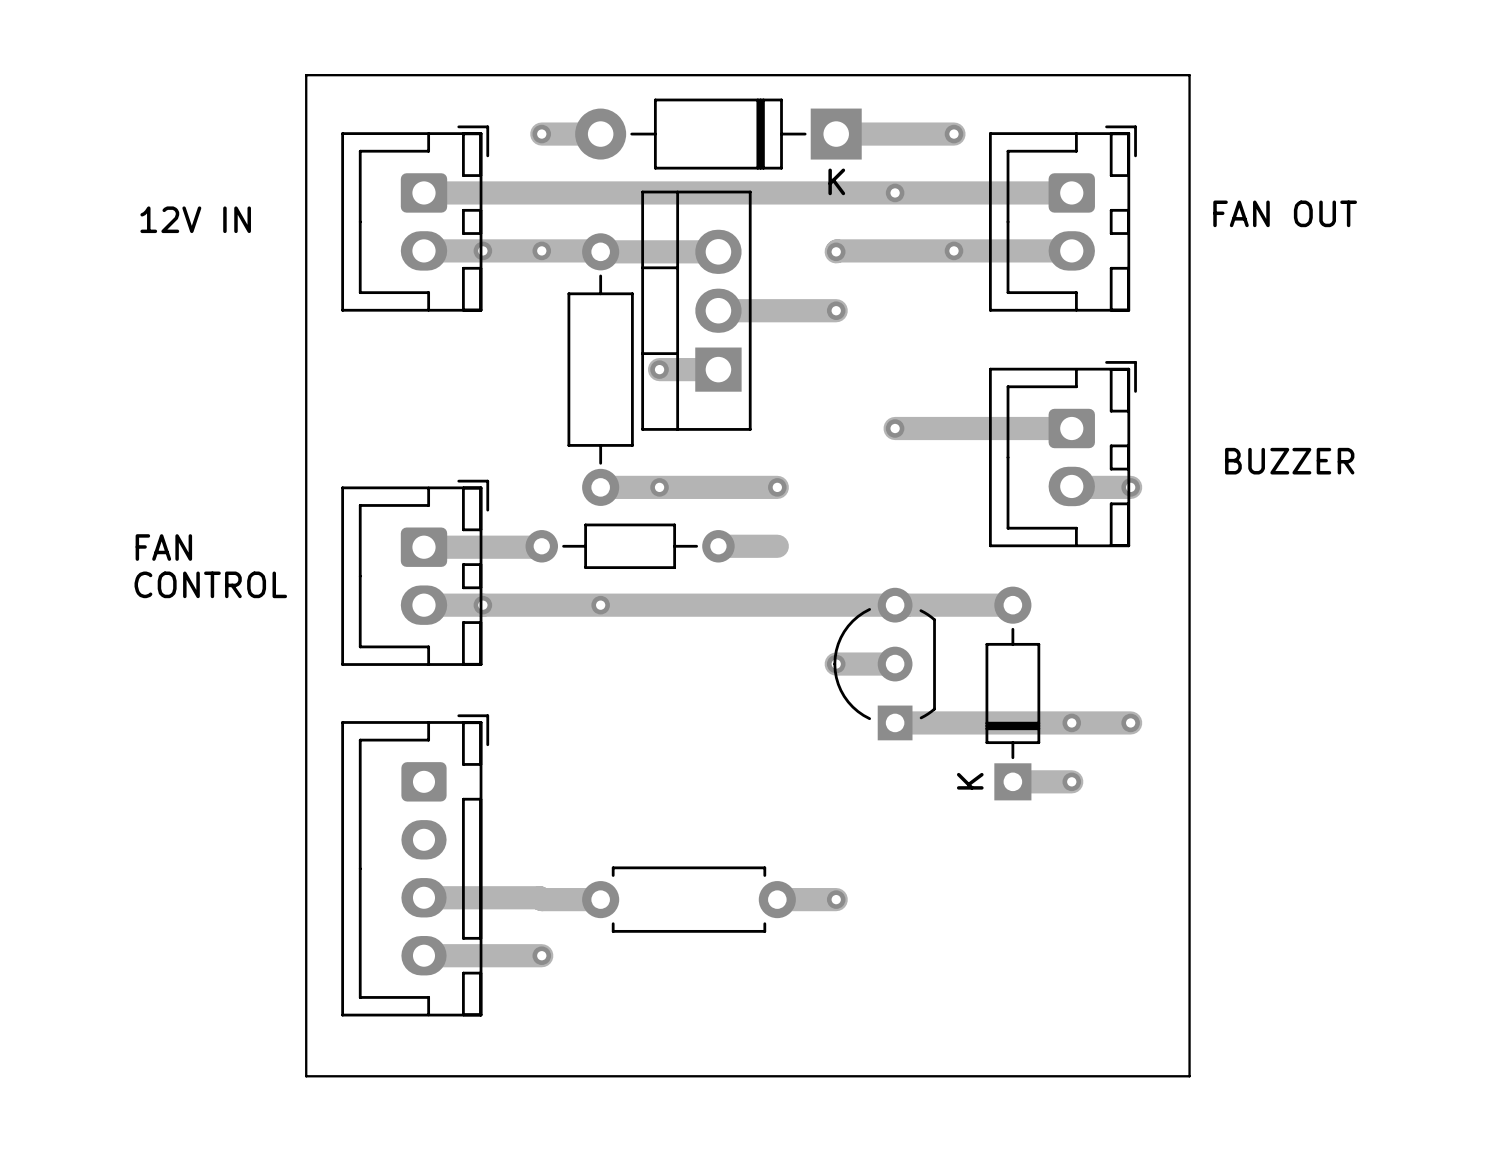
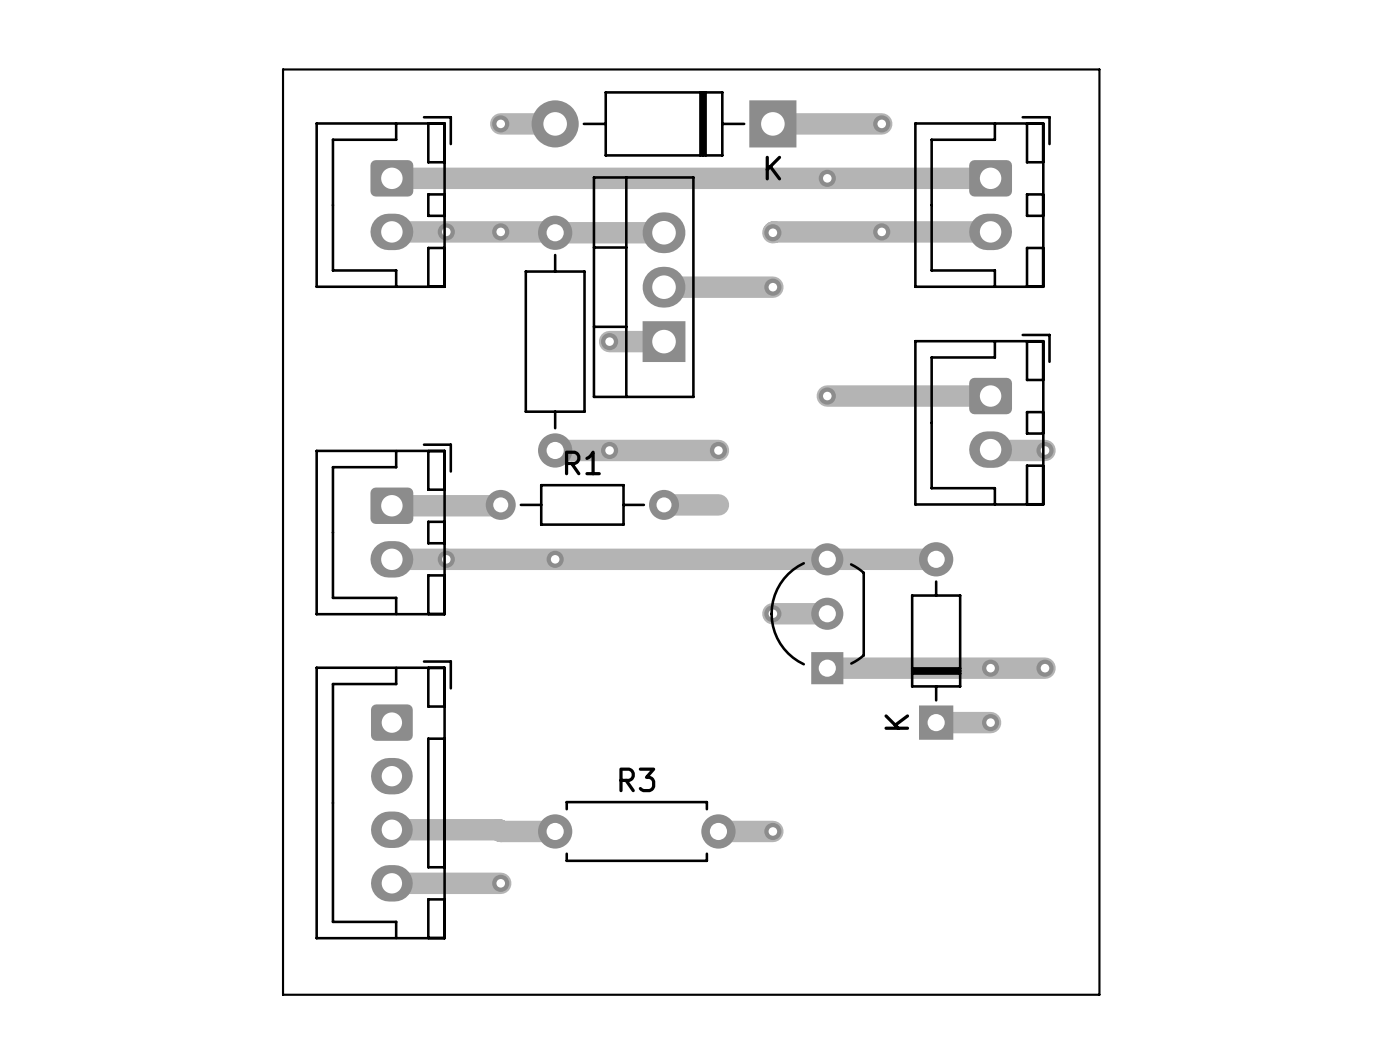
text: FAN OUT (1285, 213) -> none
text: 12V IN (195, 219) -> none
text: BUZZER (1289, 461) -> none
R1 name: none -> R1 (582, 462)
text: FAN (163, 547) -> none
text: CONTROL (210, 584) -> none
R3 name: none -> R3 (637, 779)

